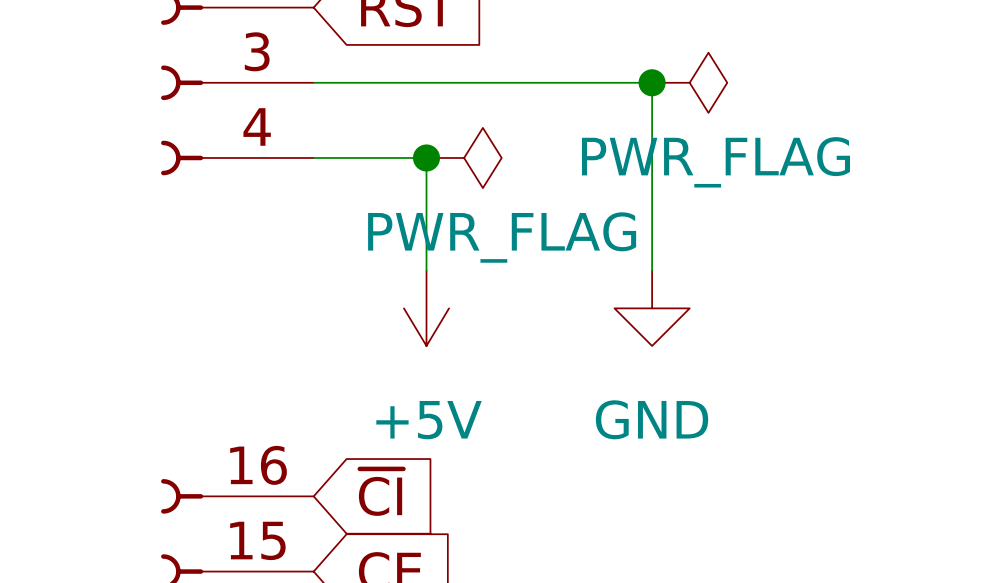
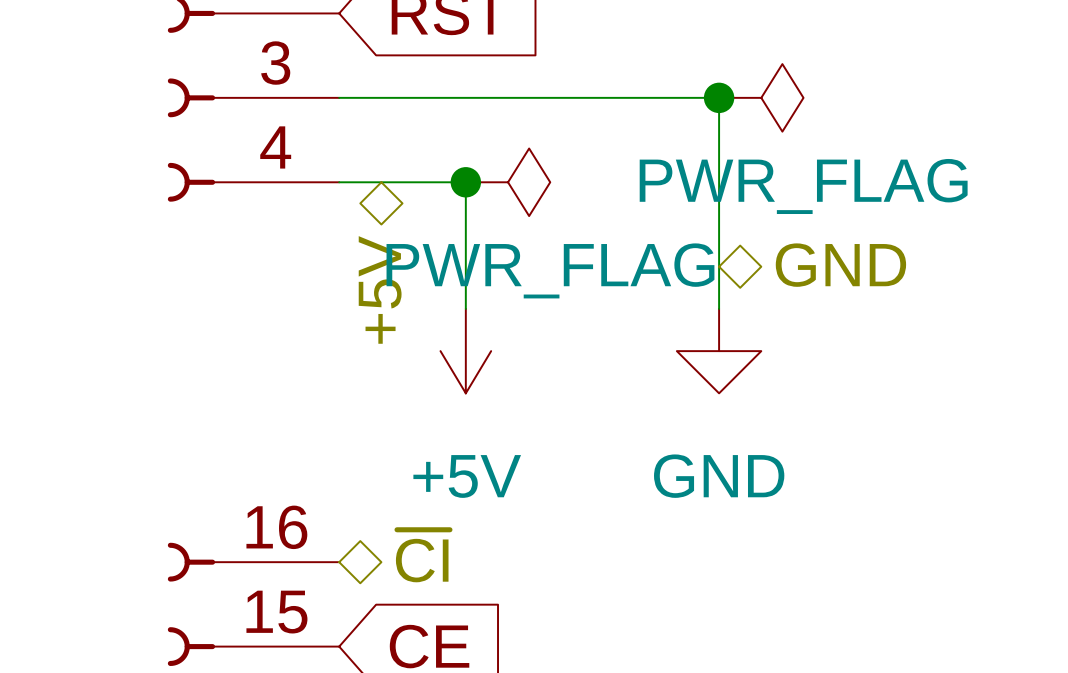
hierarchical label: none -> GND (840, 265)
hierarchical label: none -> +5V (380, 289)
hierarchical label: none -> ~{CI} (422, 556)
global label: ~{CI} (381, 492) -> none

